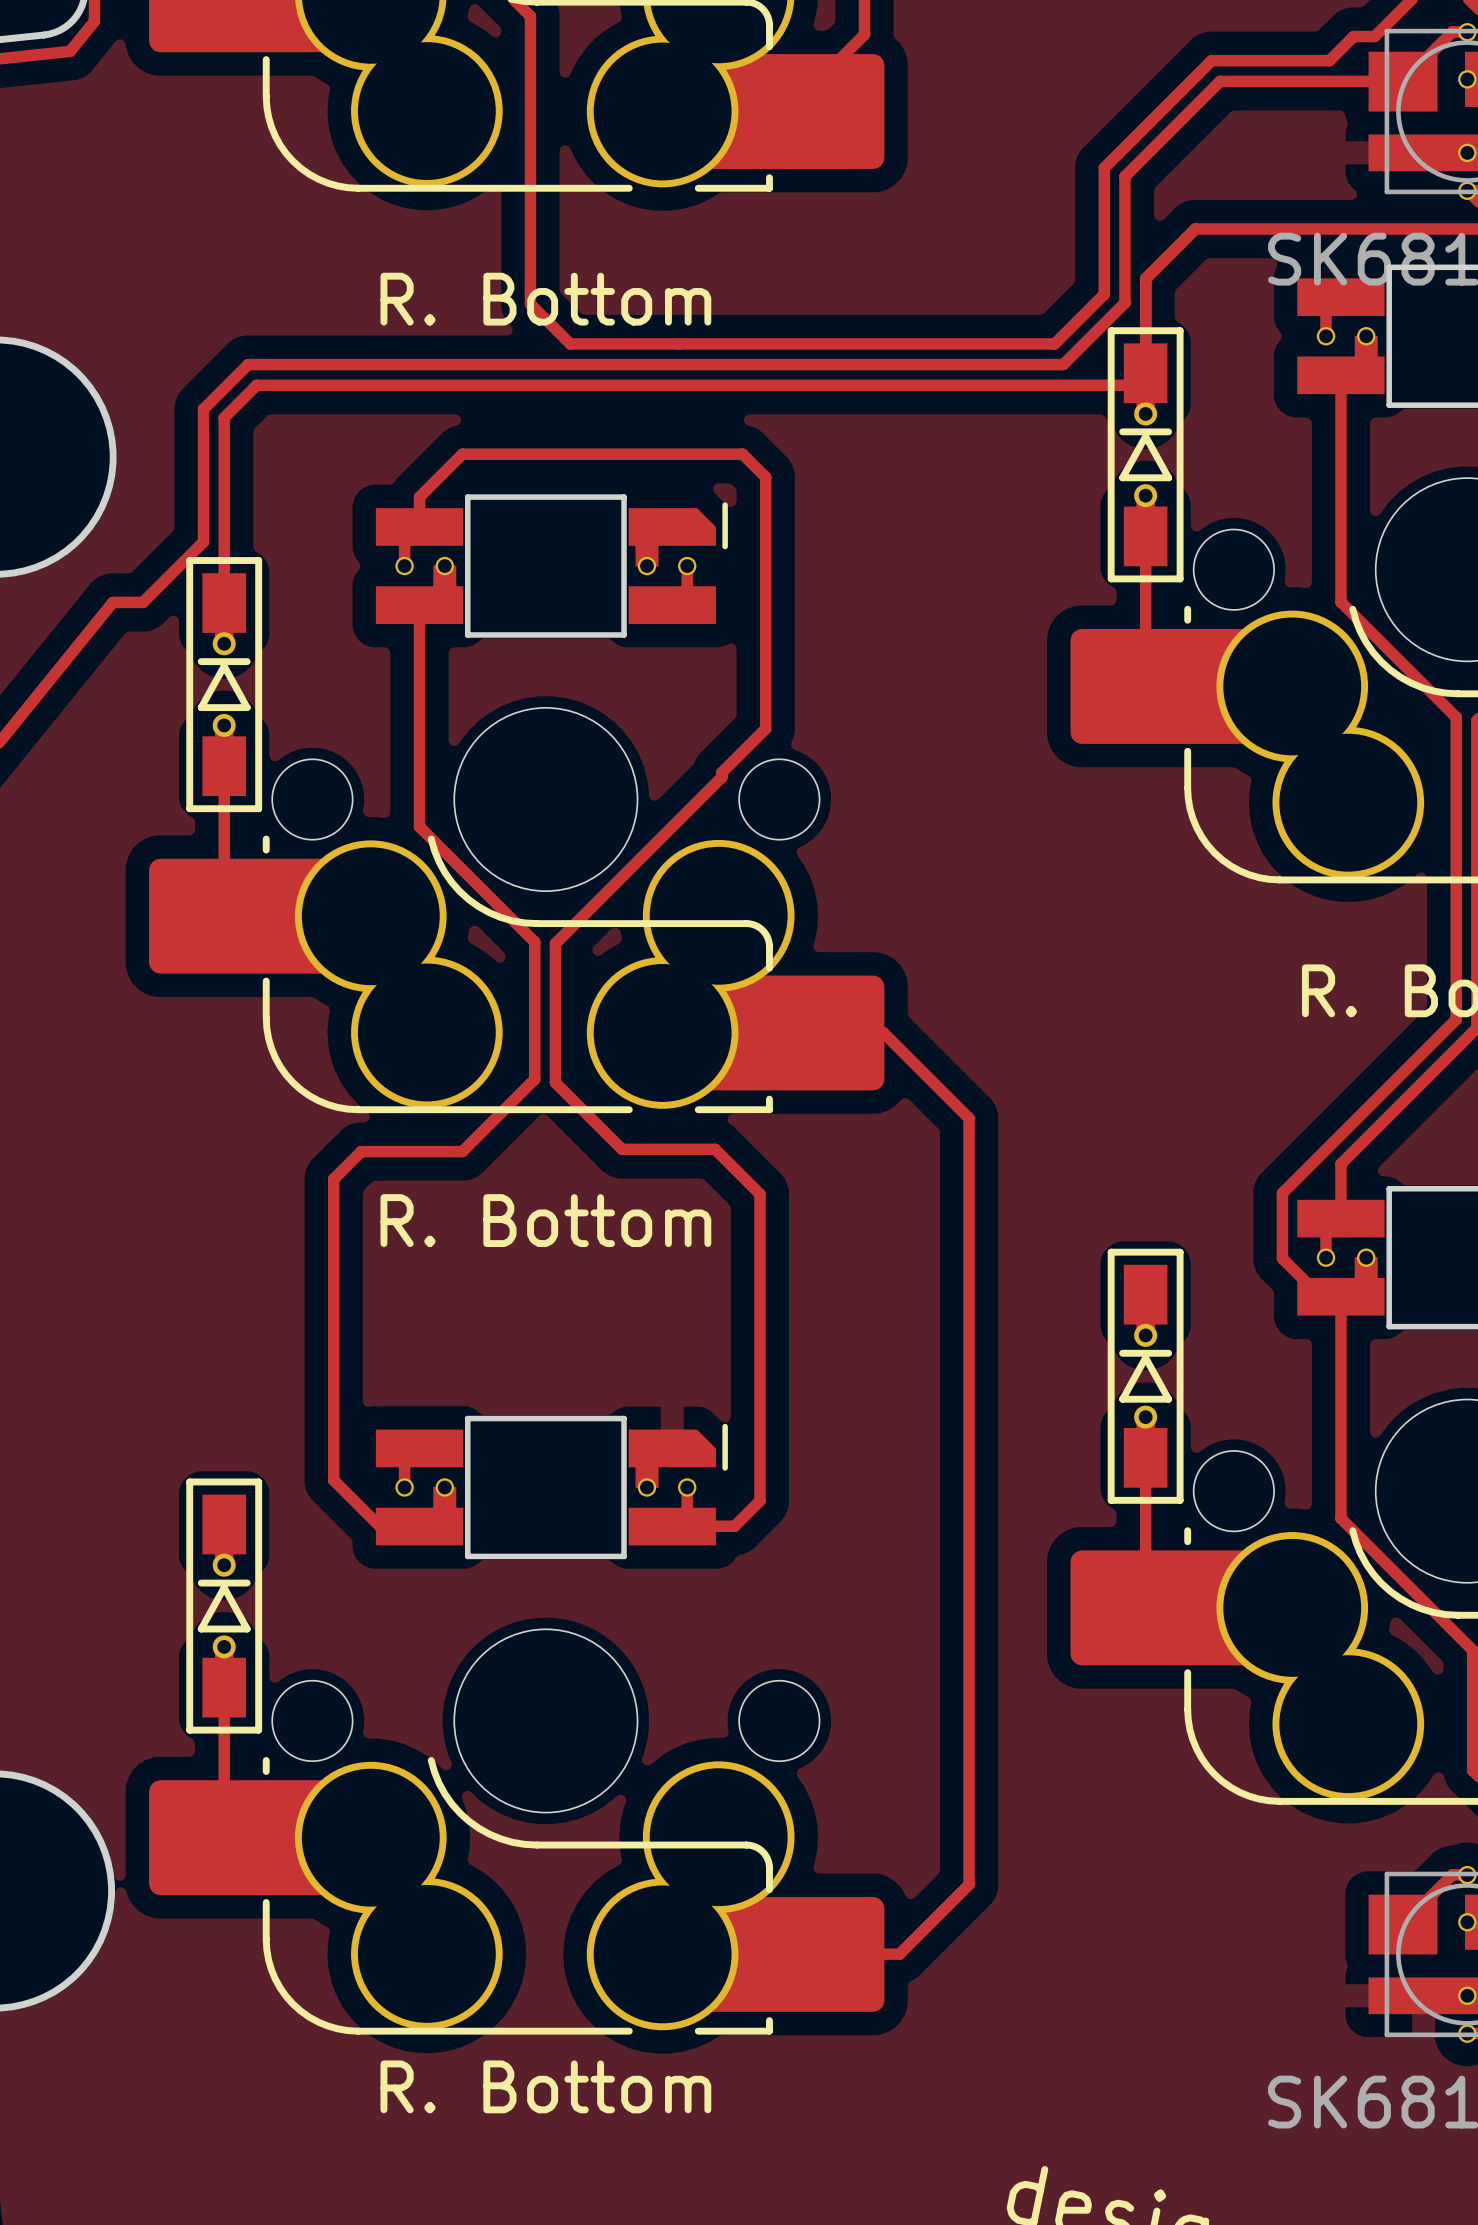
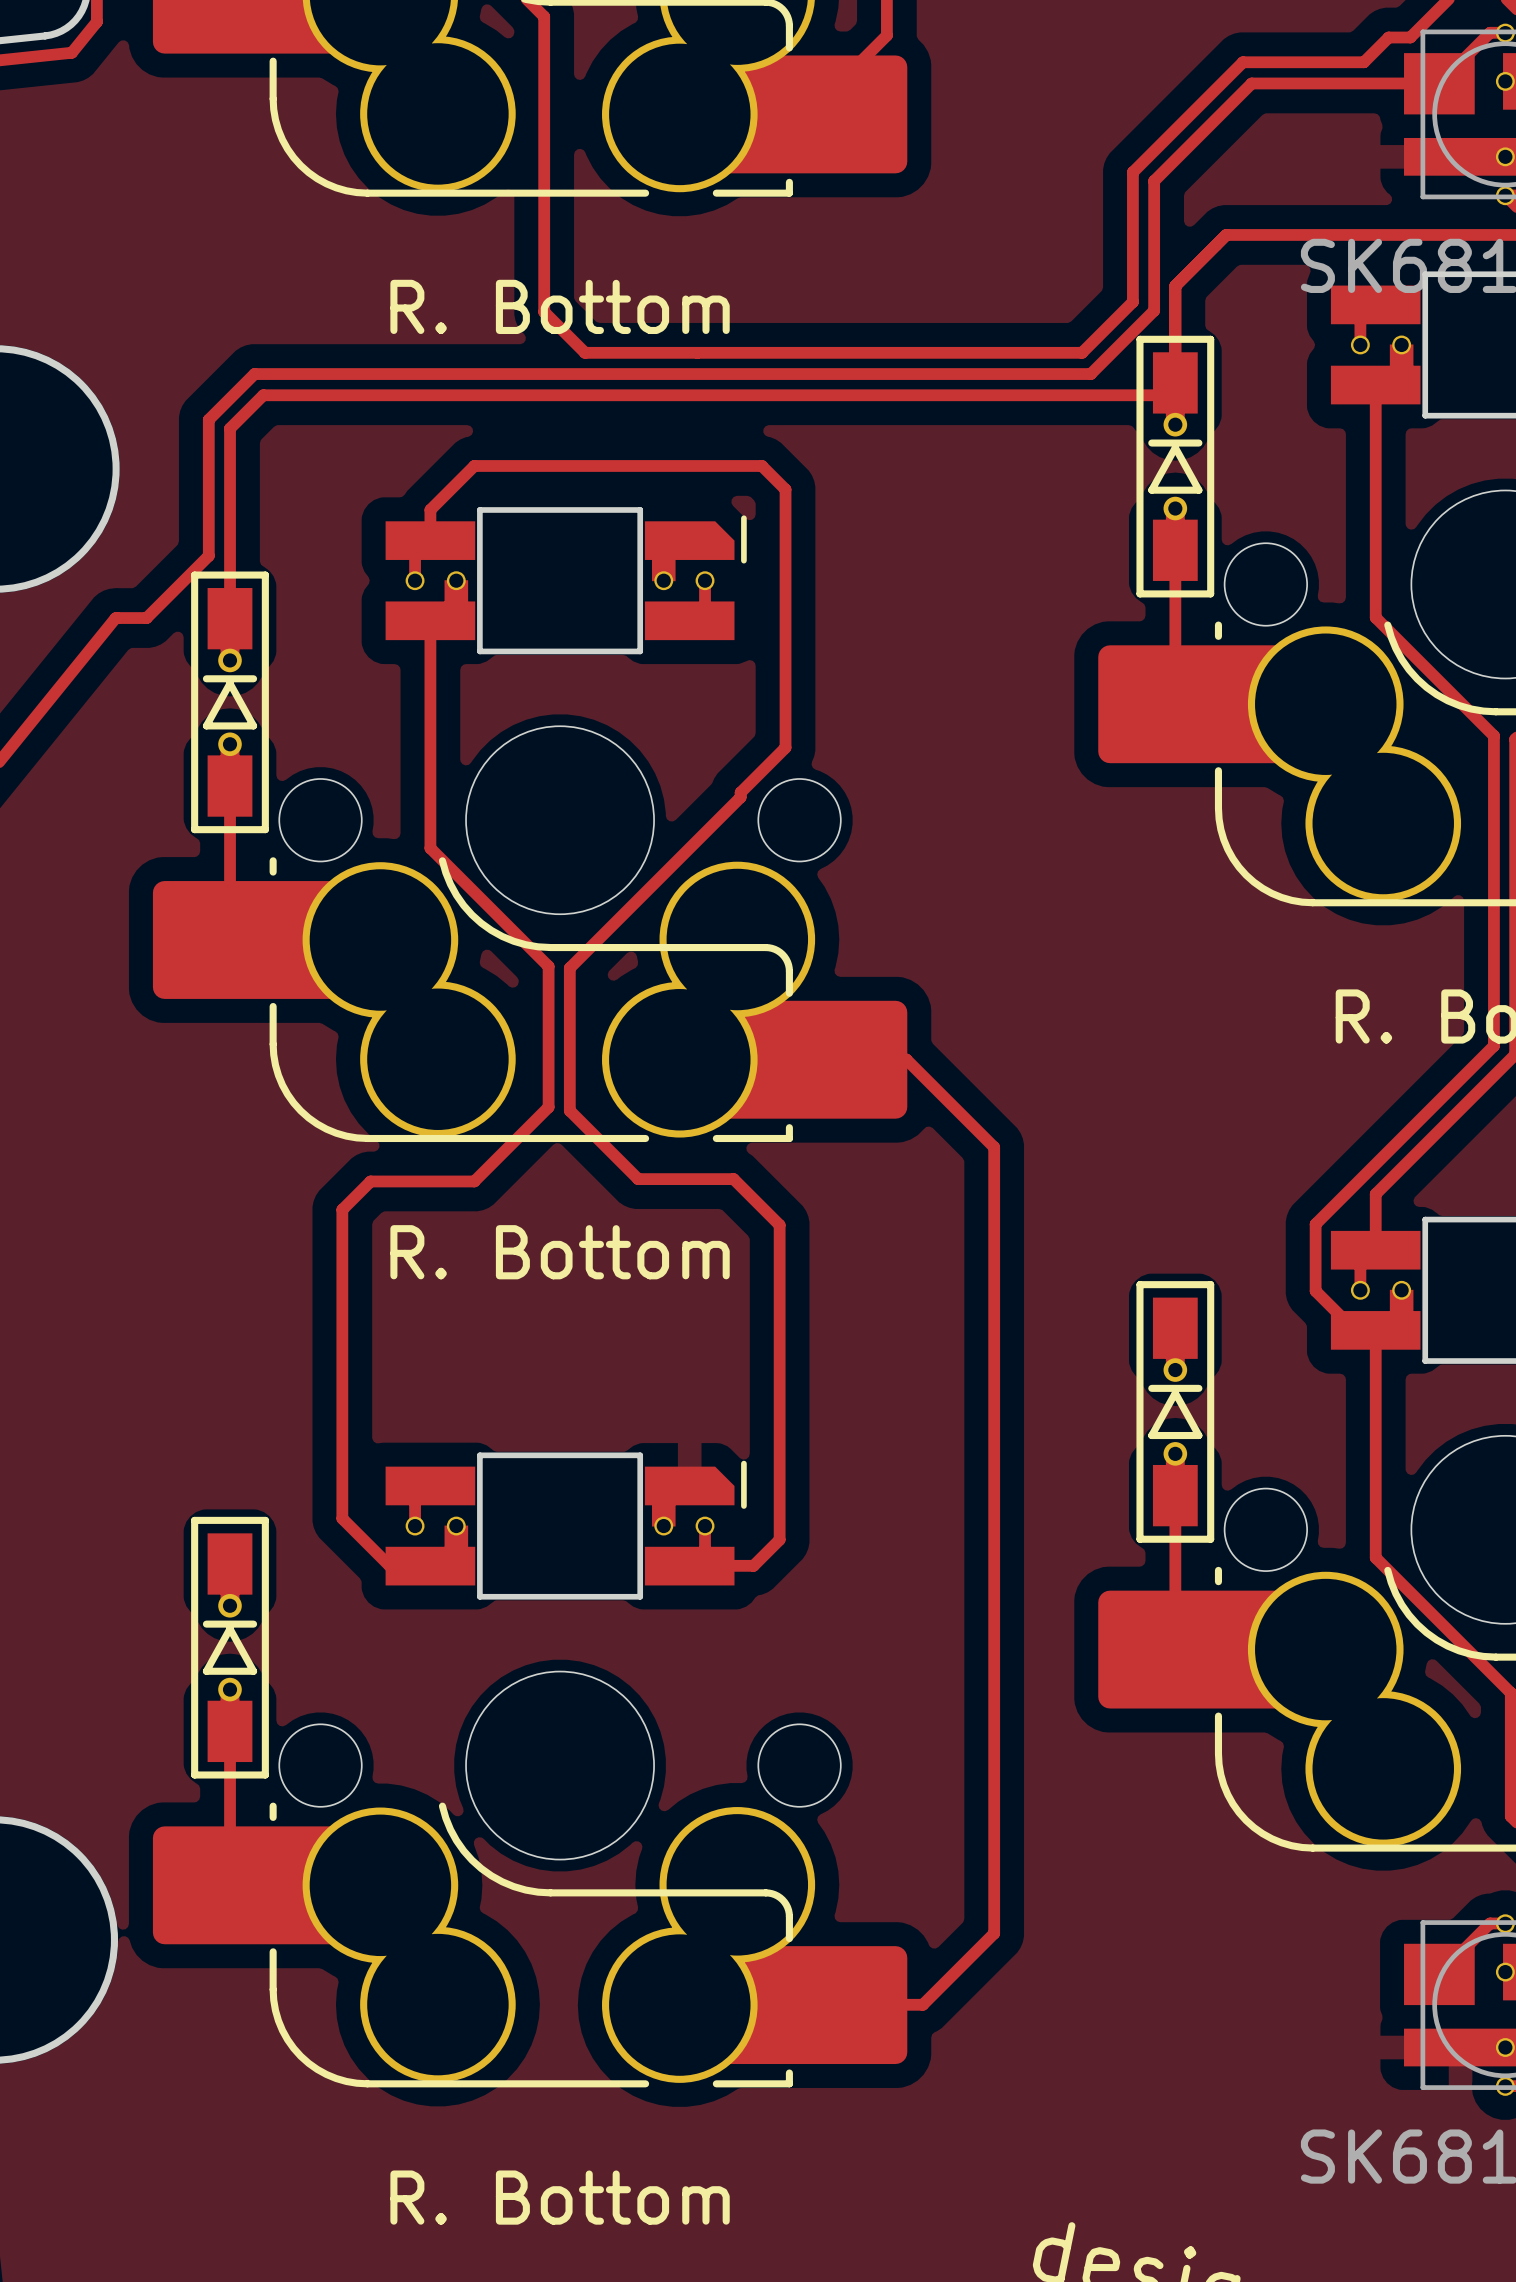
text position: R. Bottom (545, 2086) -> R. Bottom (560, 2197)

